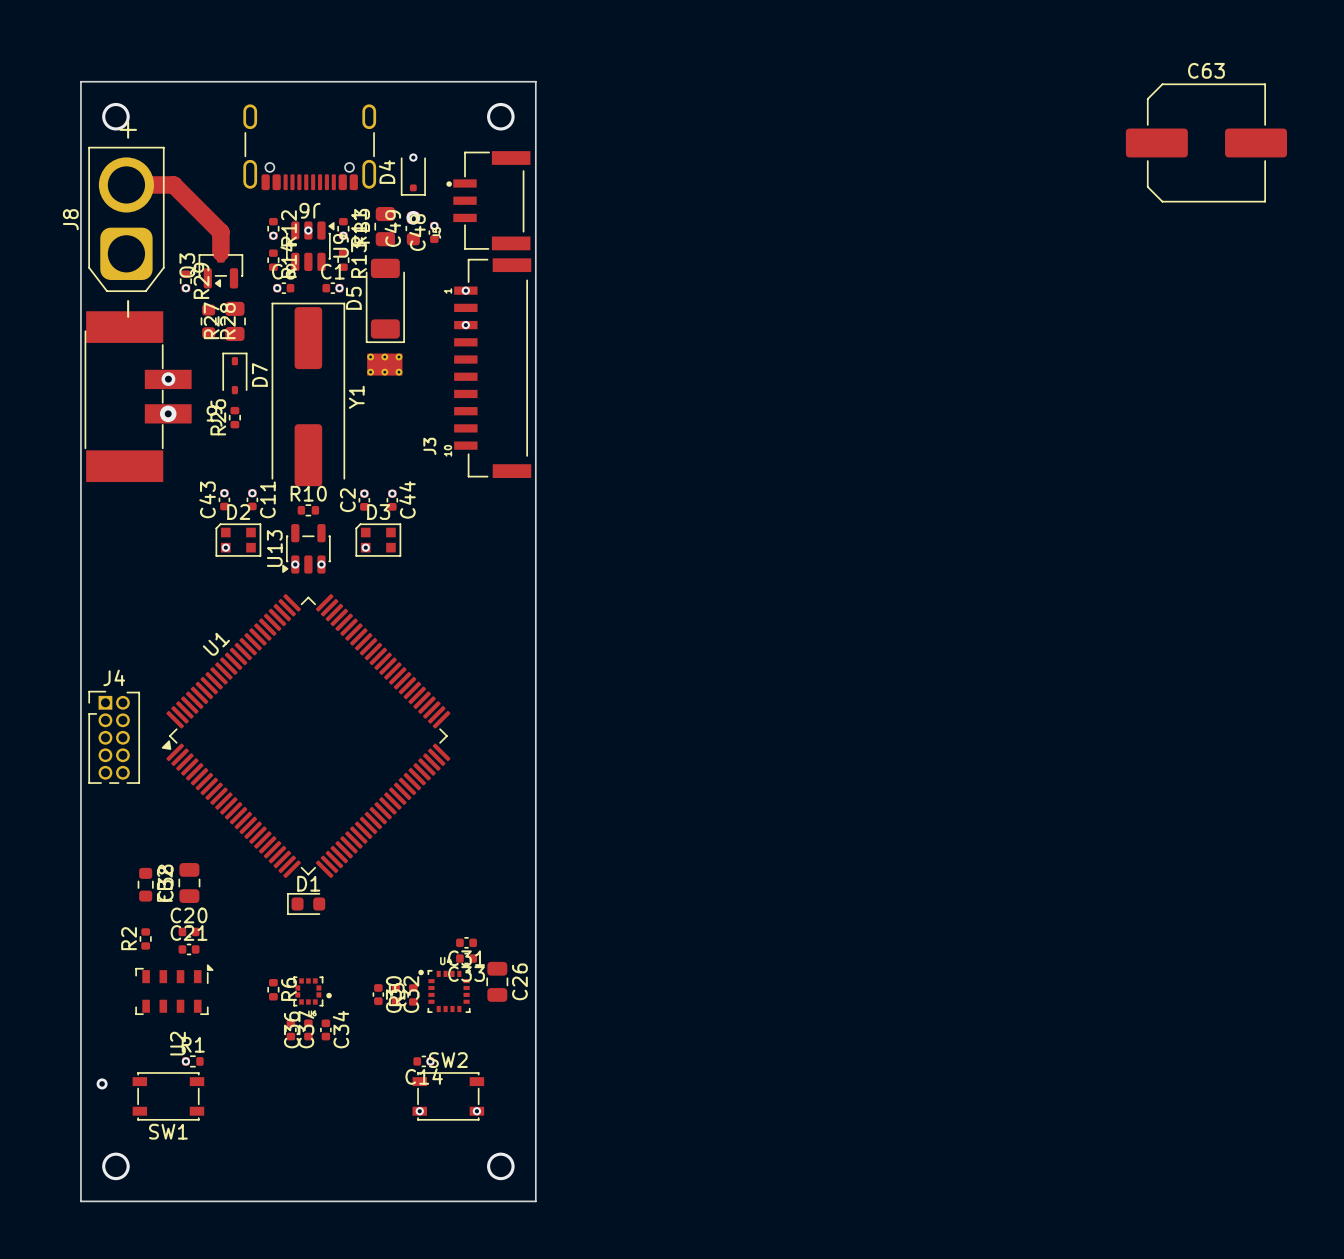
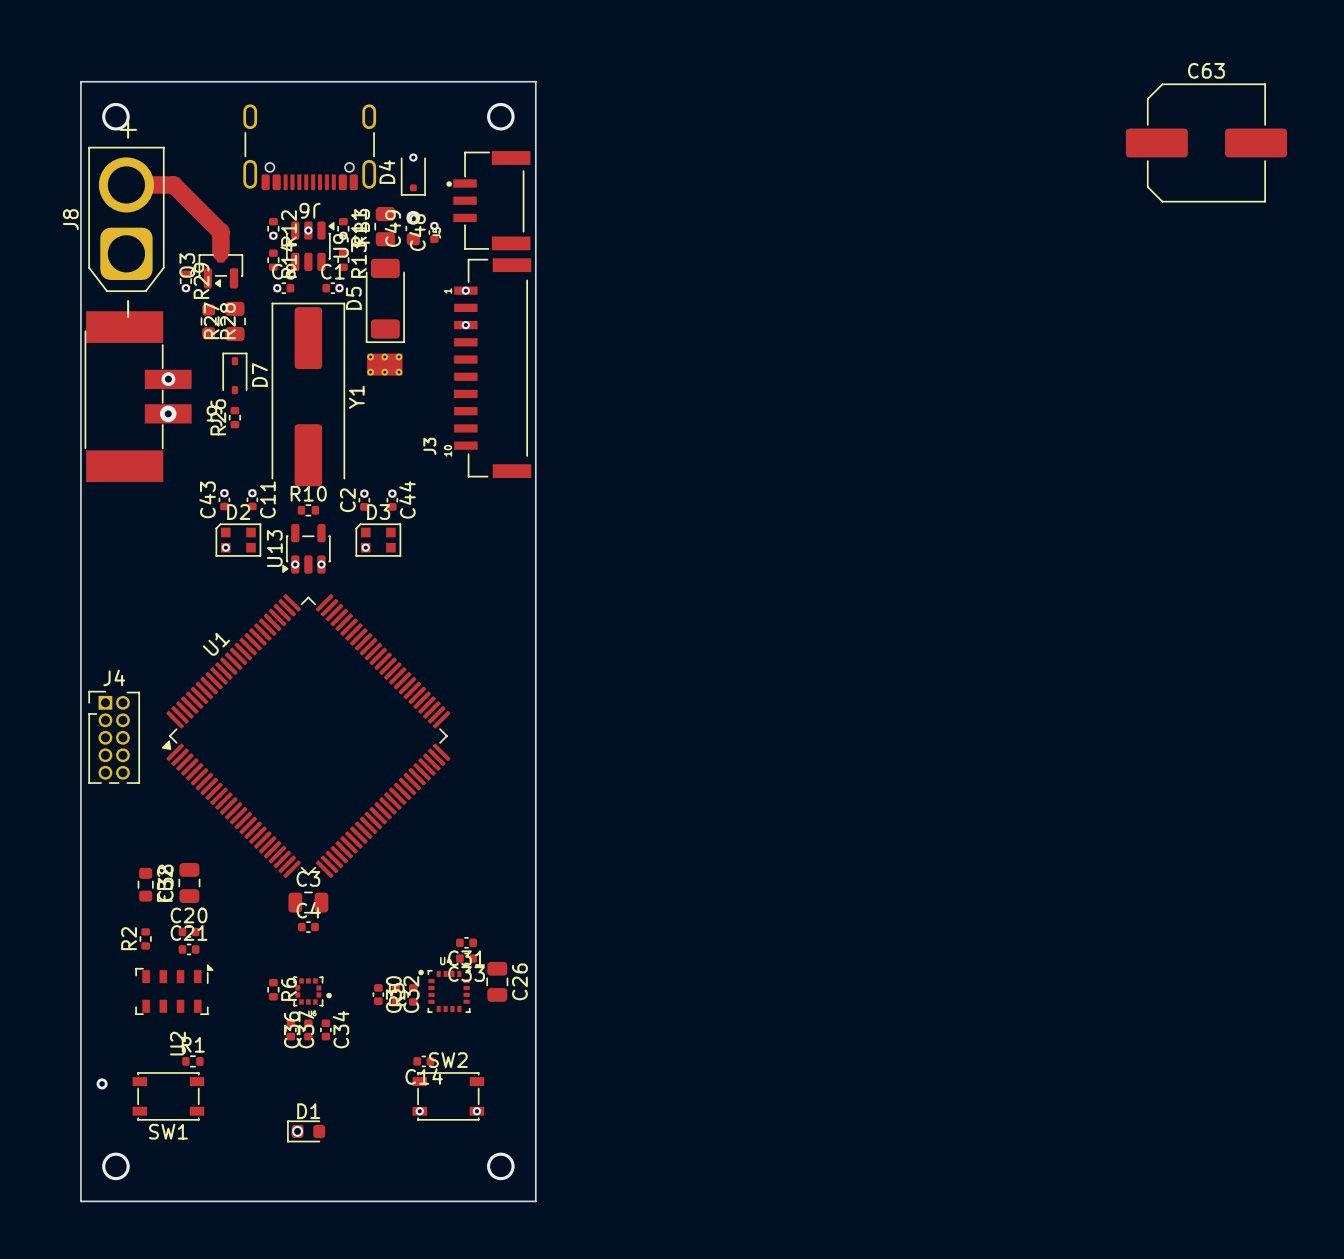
C3: none -> (308, 902)
D1 position: (306, 903) -> (306, 1131)
C4: none -> (308, 927)
via: (185, 1061) -> none
via: (430, 1061) -> none
via: none -> (297, 1131)

